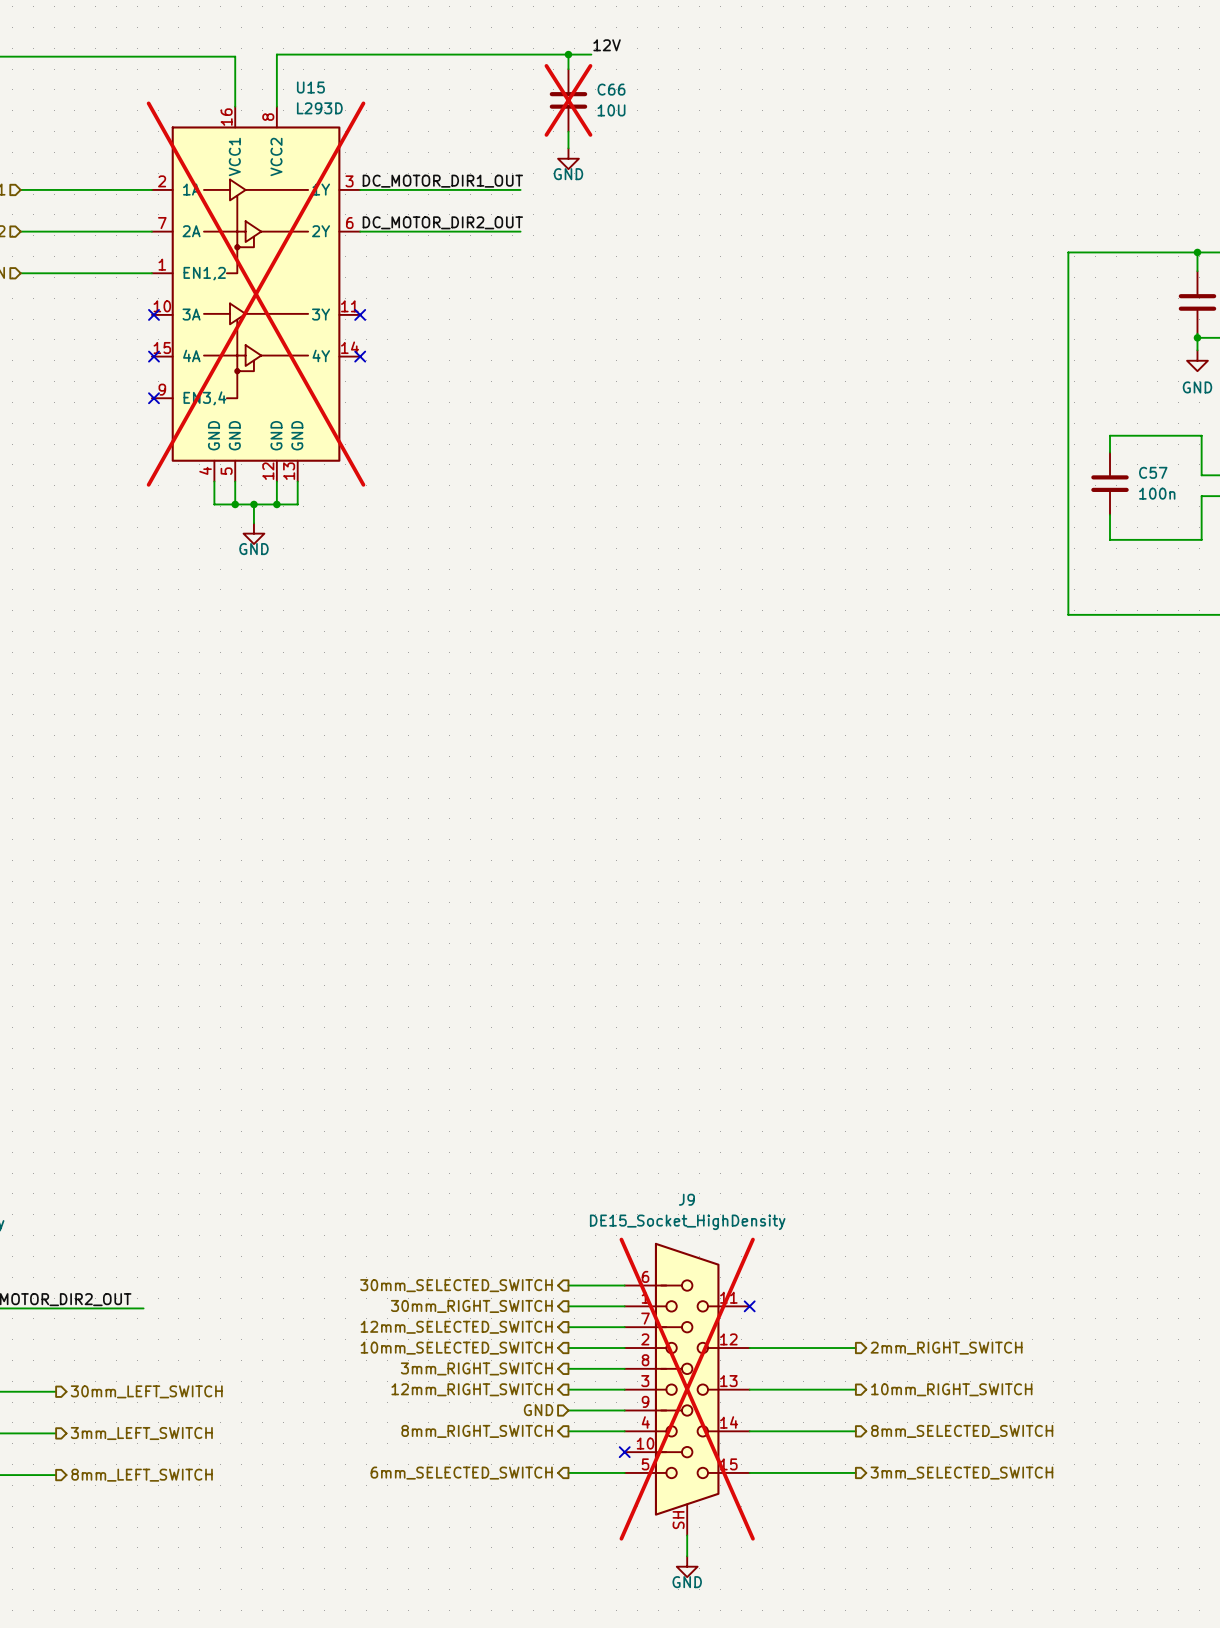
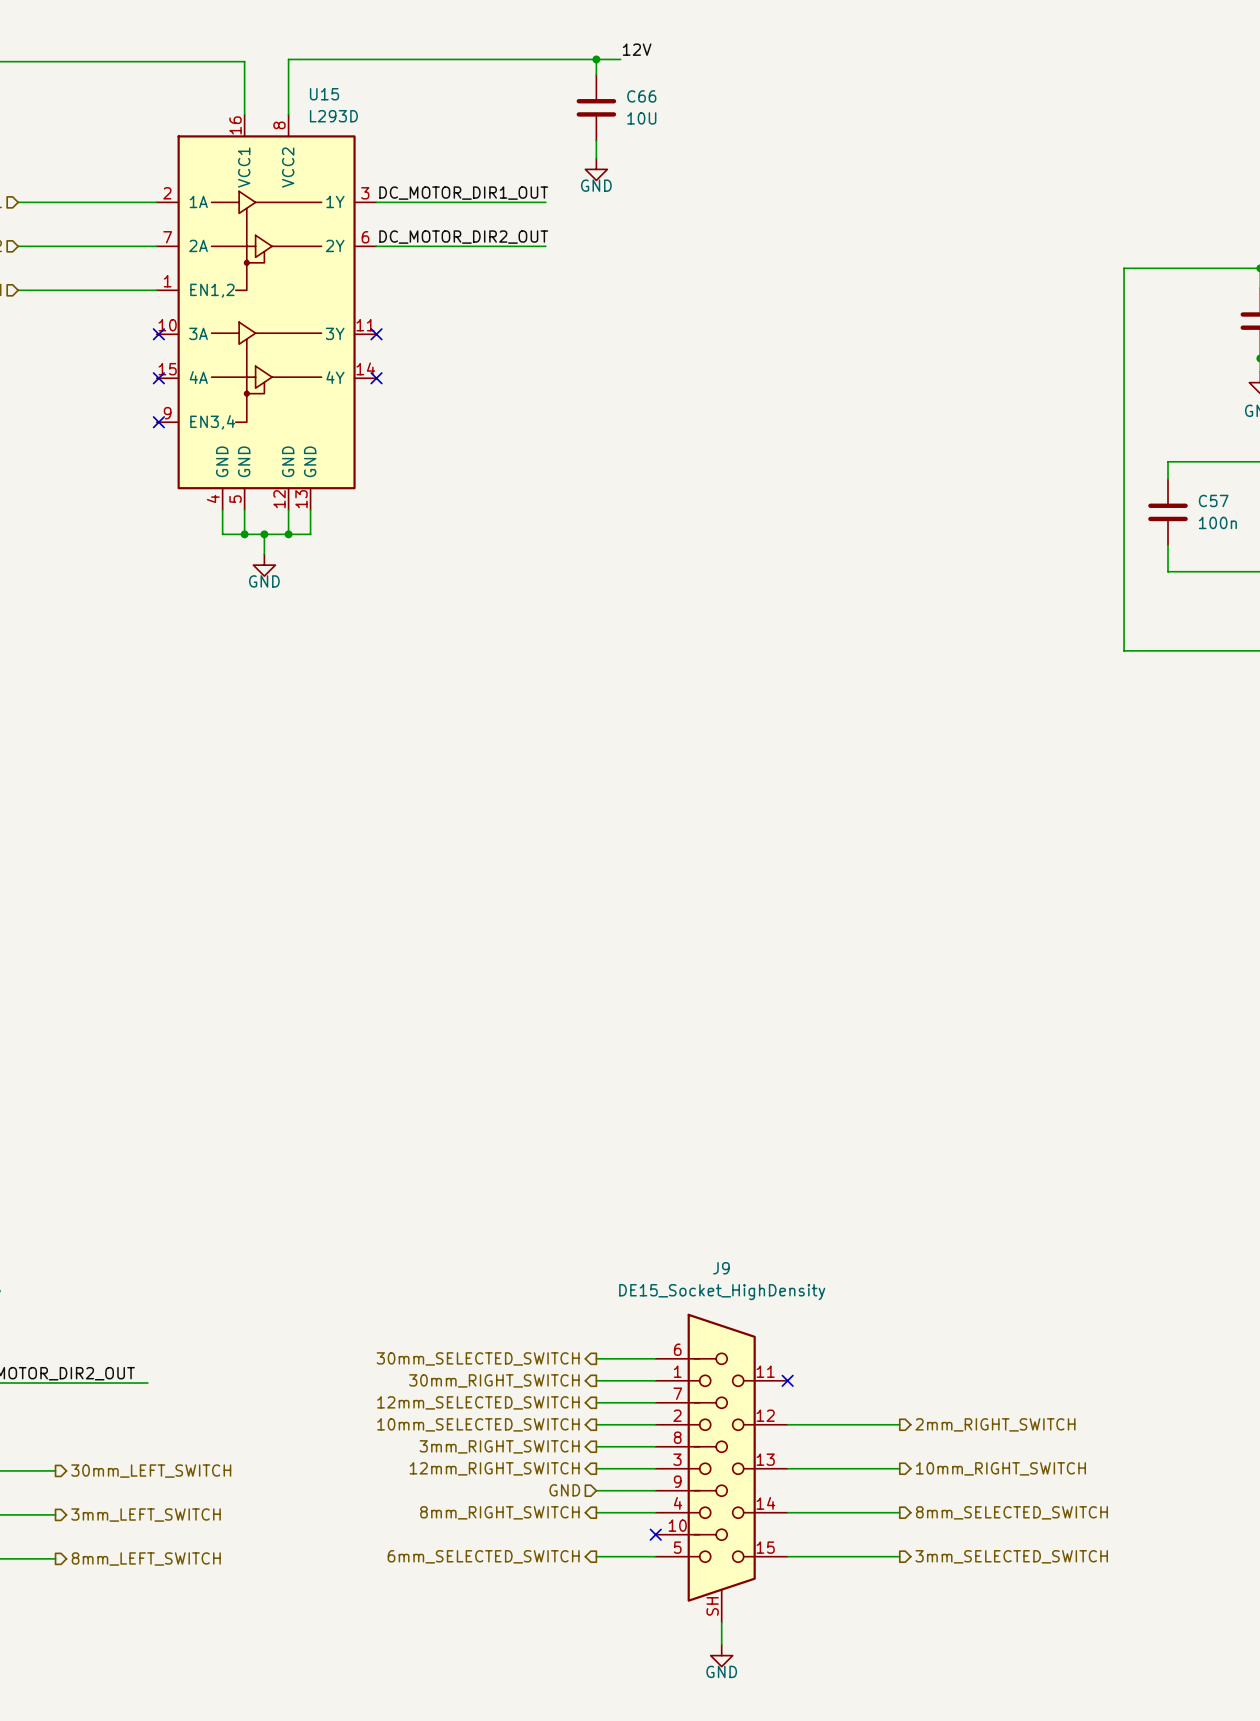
C66 do-not-place cross: (568, 100) -> none
U15 do-not-place cross: (256, 294) -> none
J9 do-not-place cross: (687, 1389) -> none

